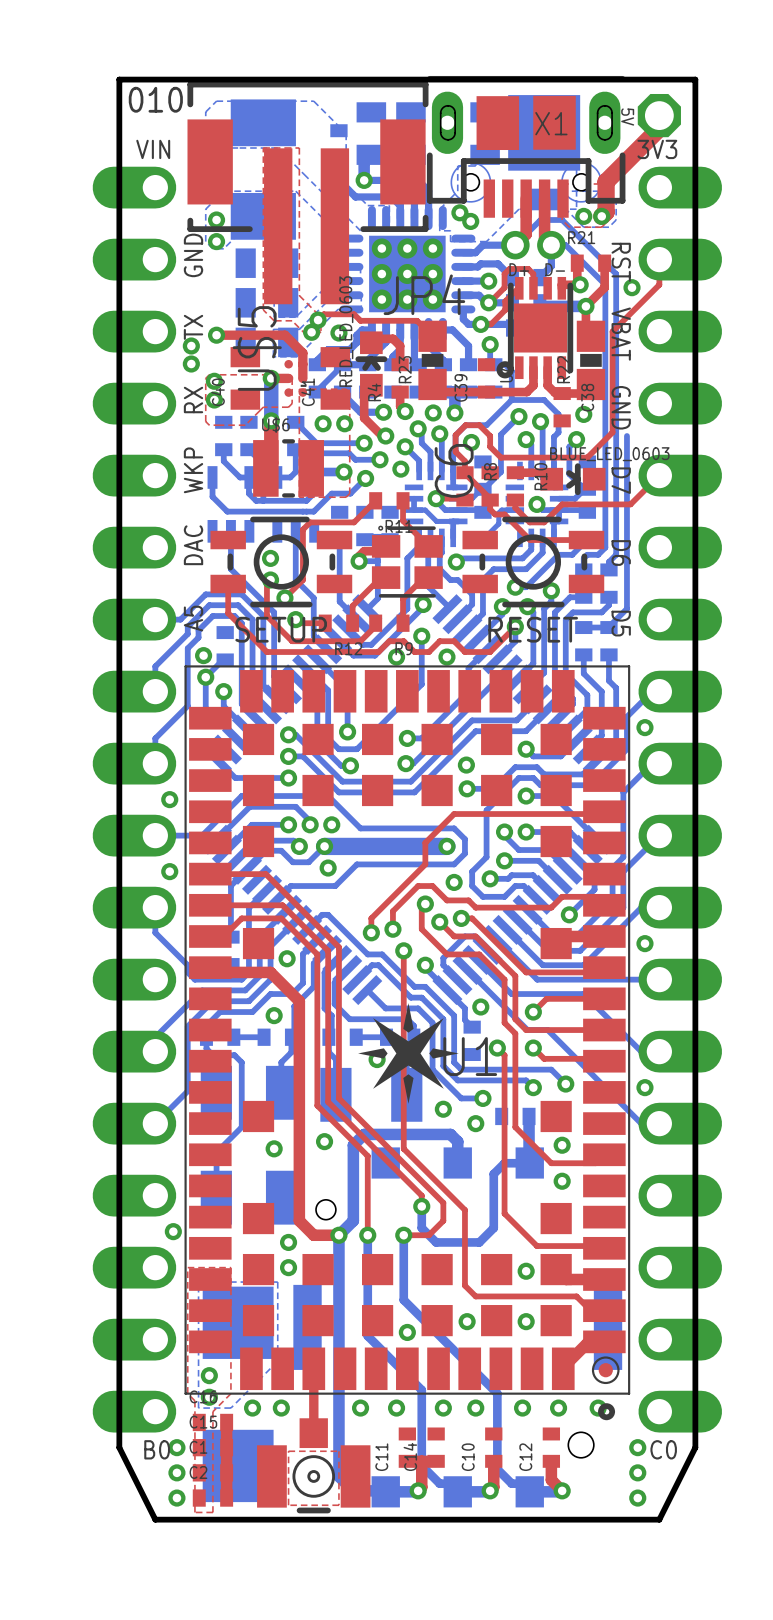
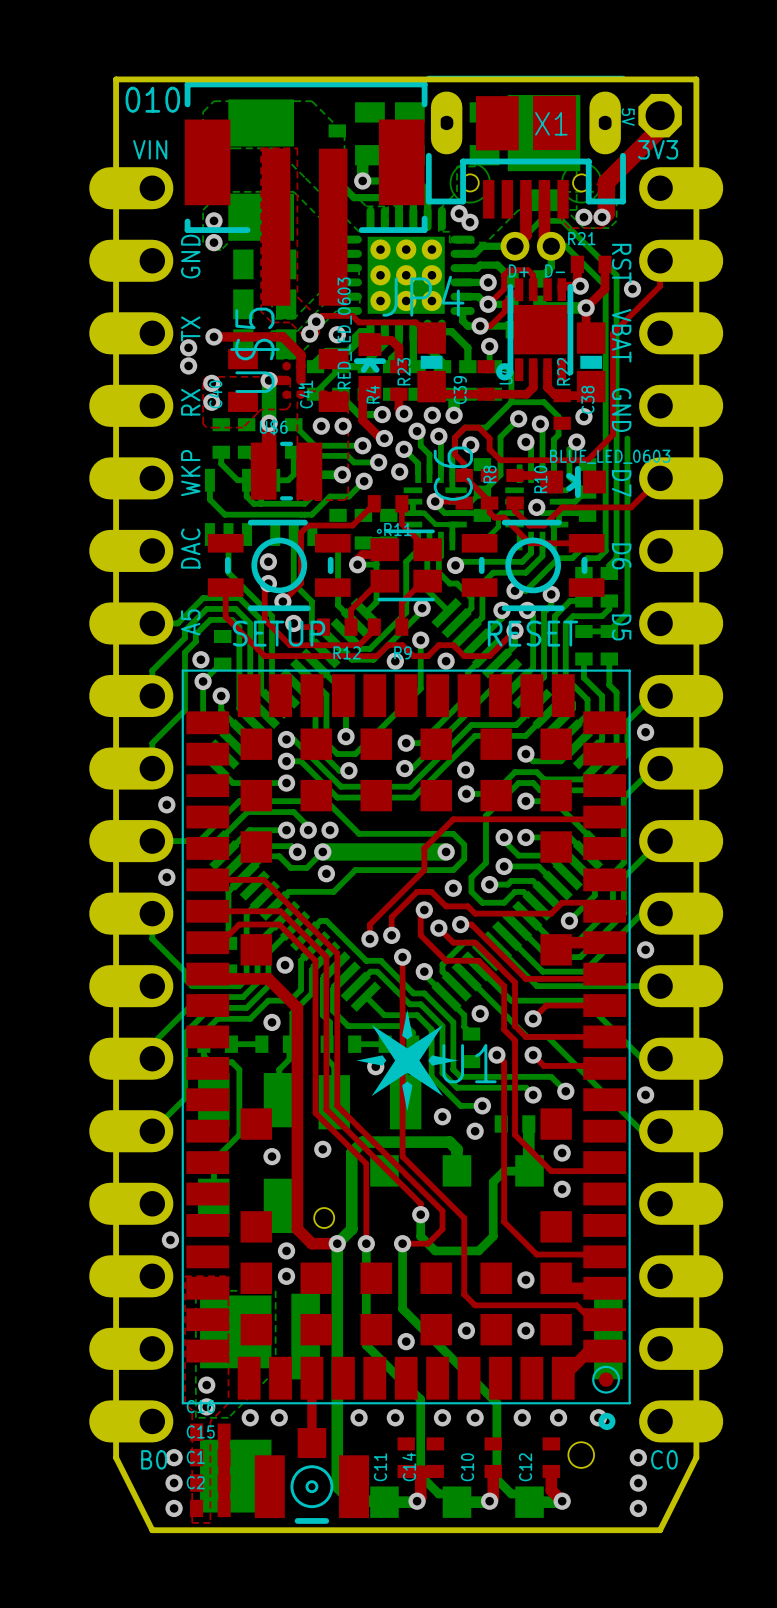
top zone outline: (288, 1451) (338, 1451) (338, 1505) (288, 1505) (288, 1451) -> none

